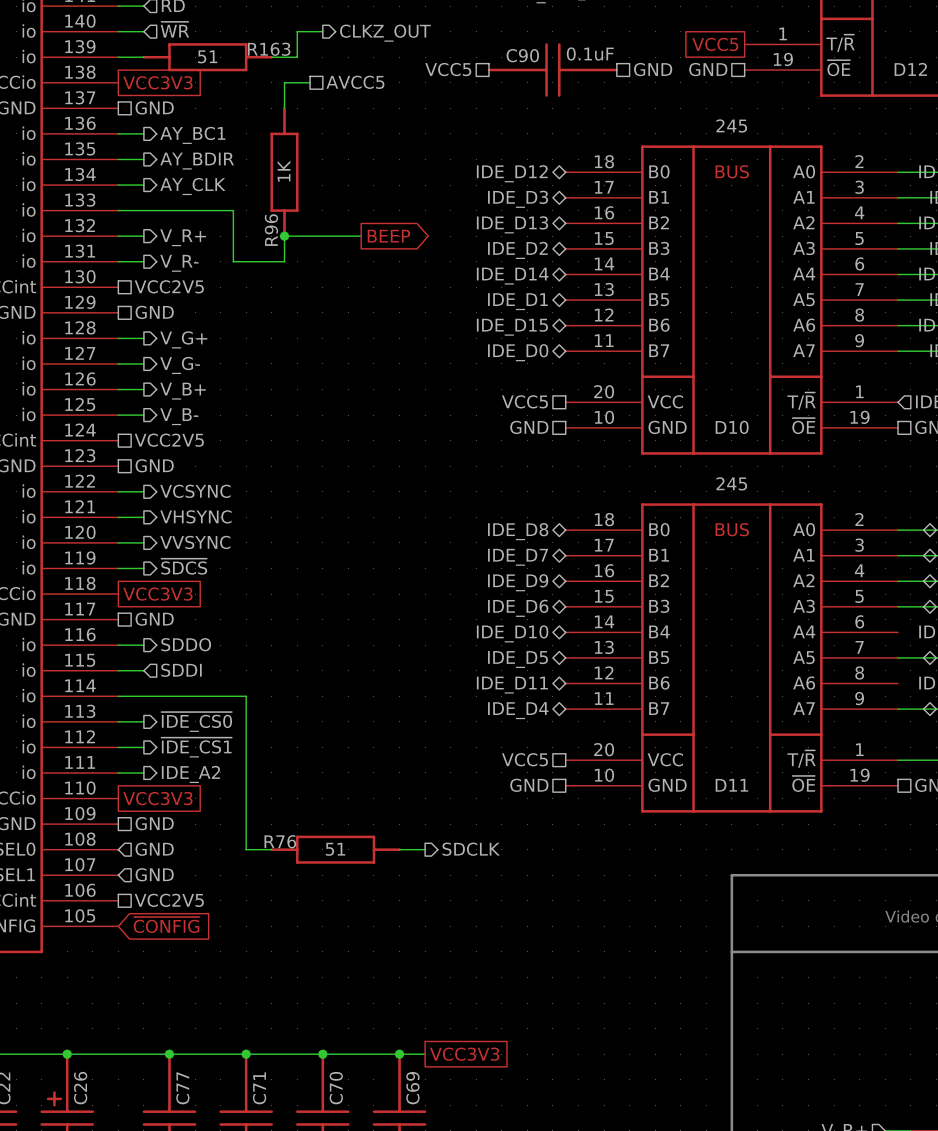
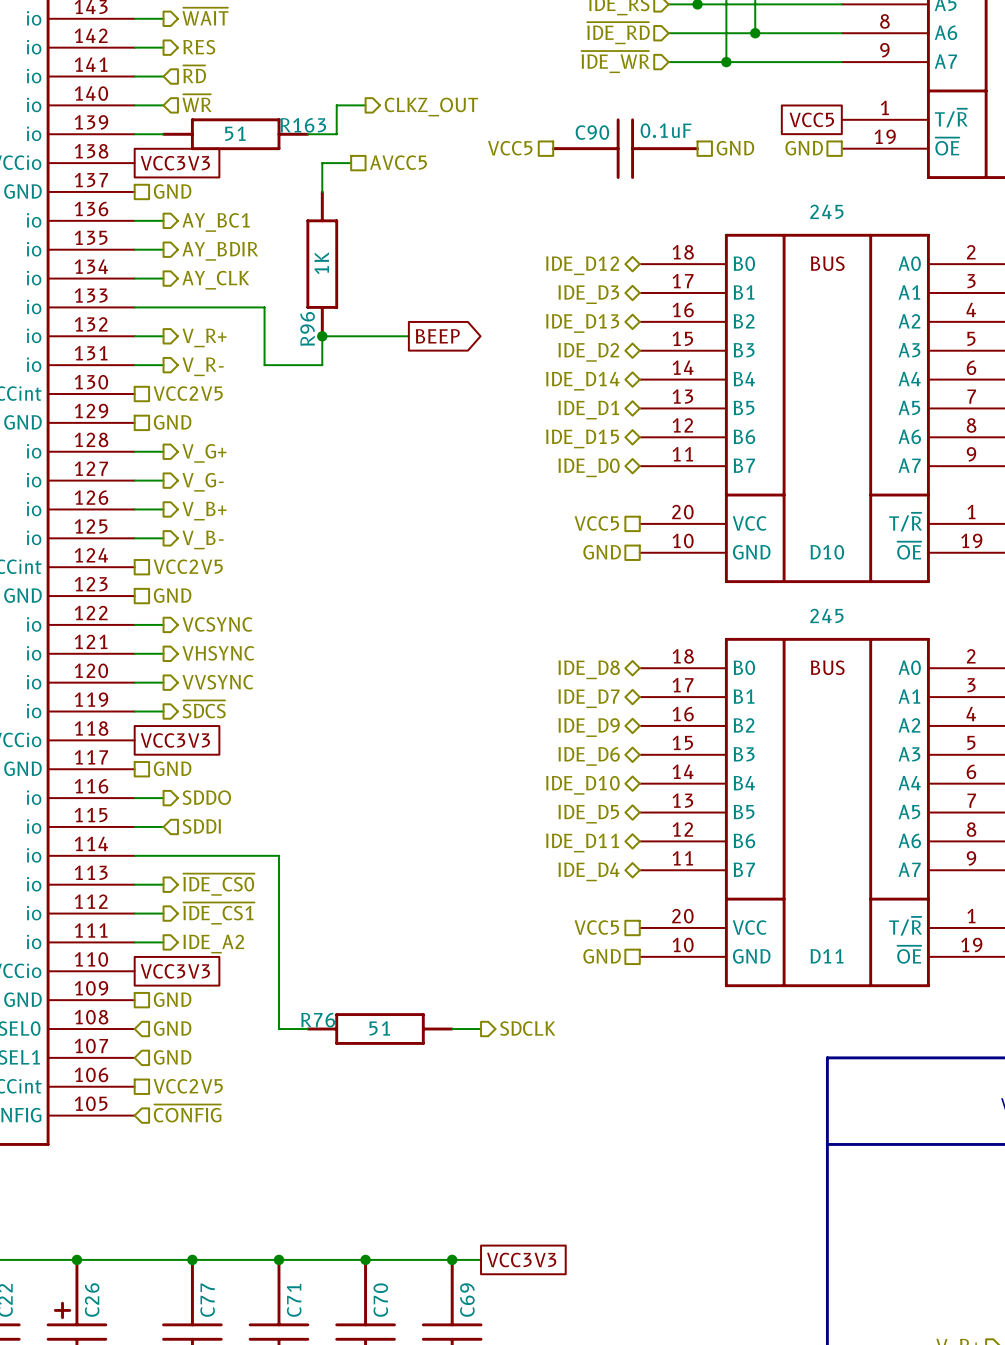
hierarchical label: none -> ~{CONFIG} (187, 1113)
global label: ~{CONFIG} (166, 925) -> none

